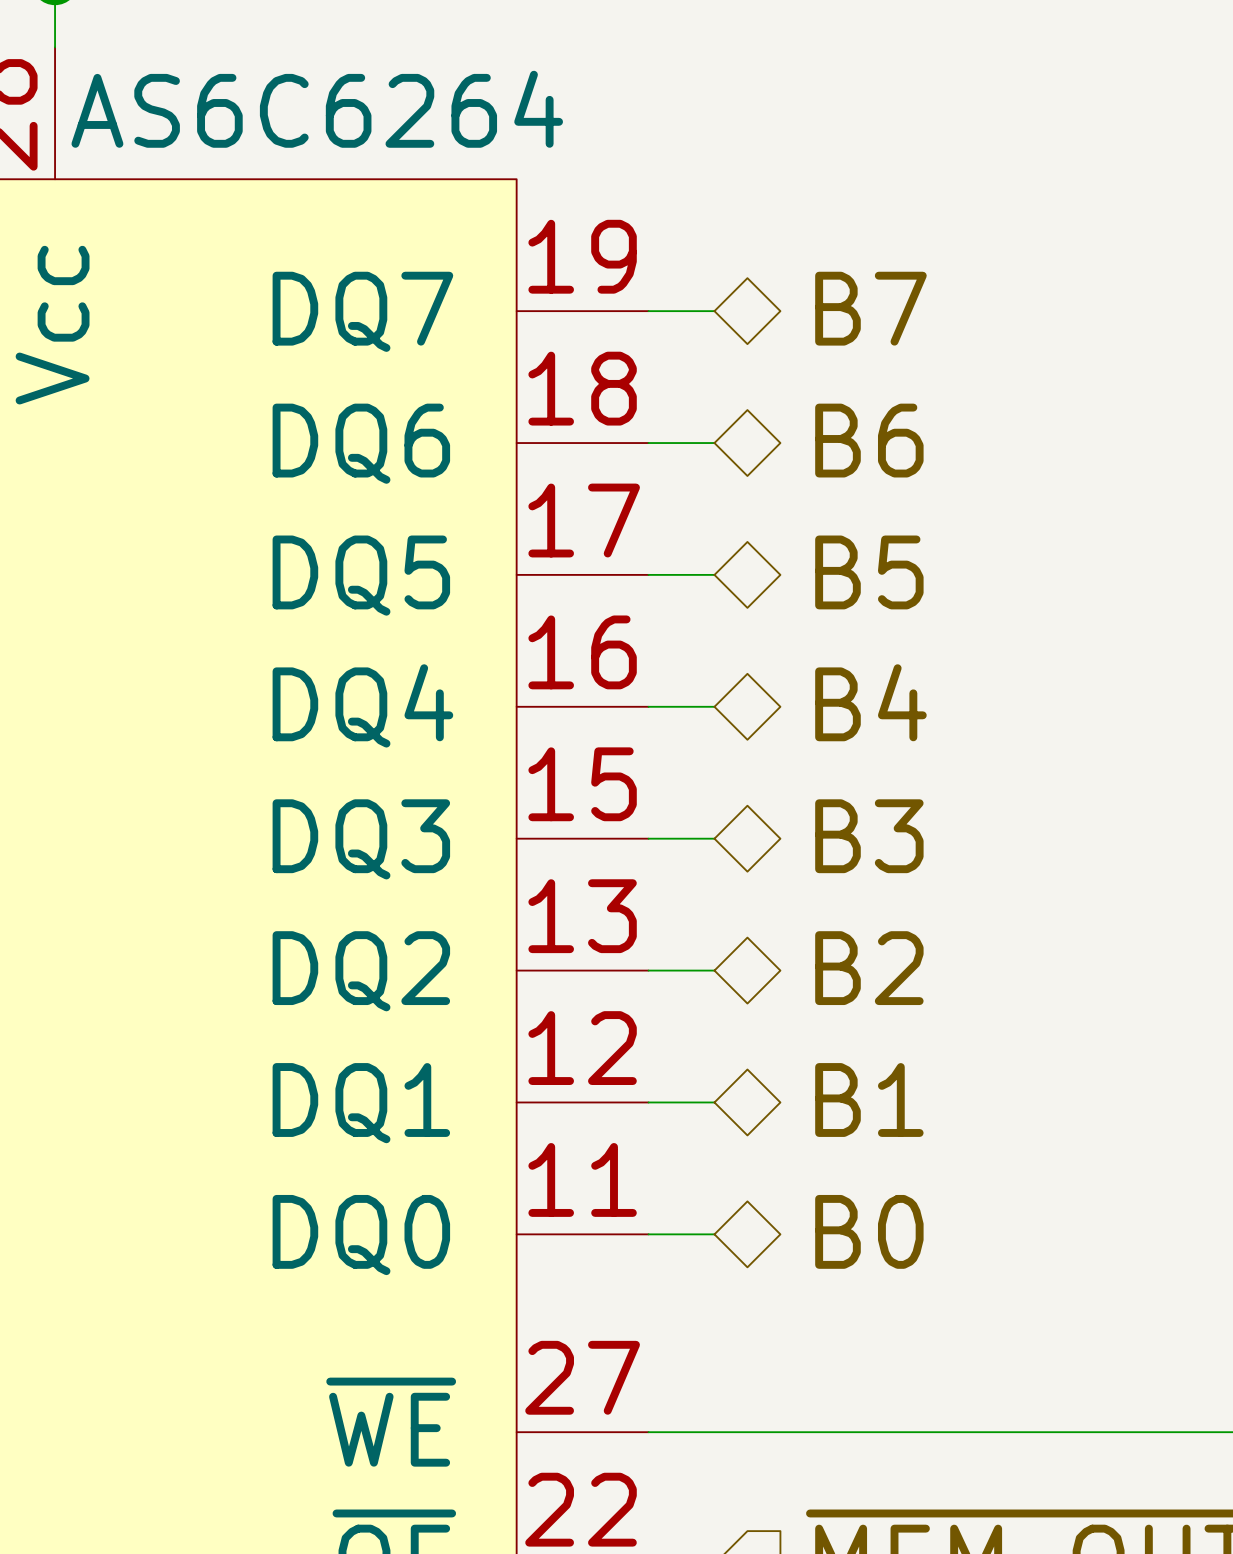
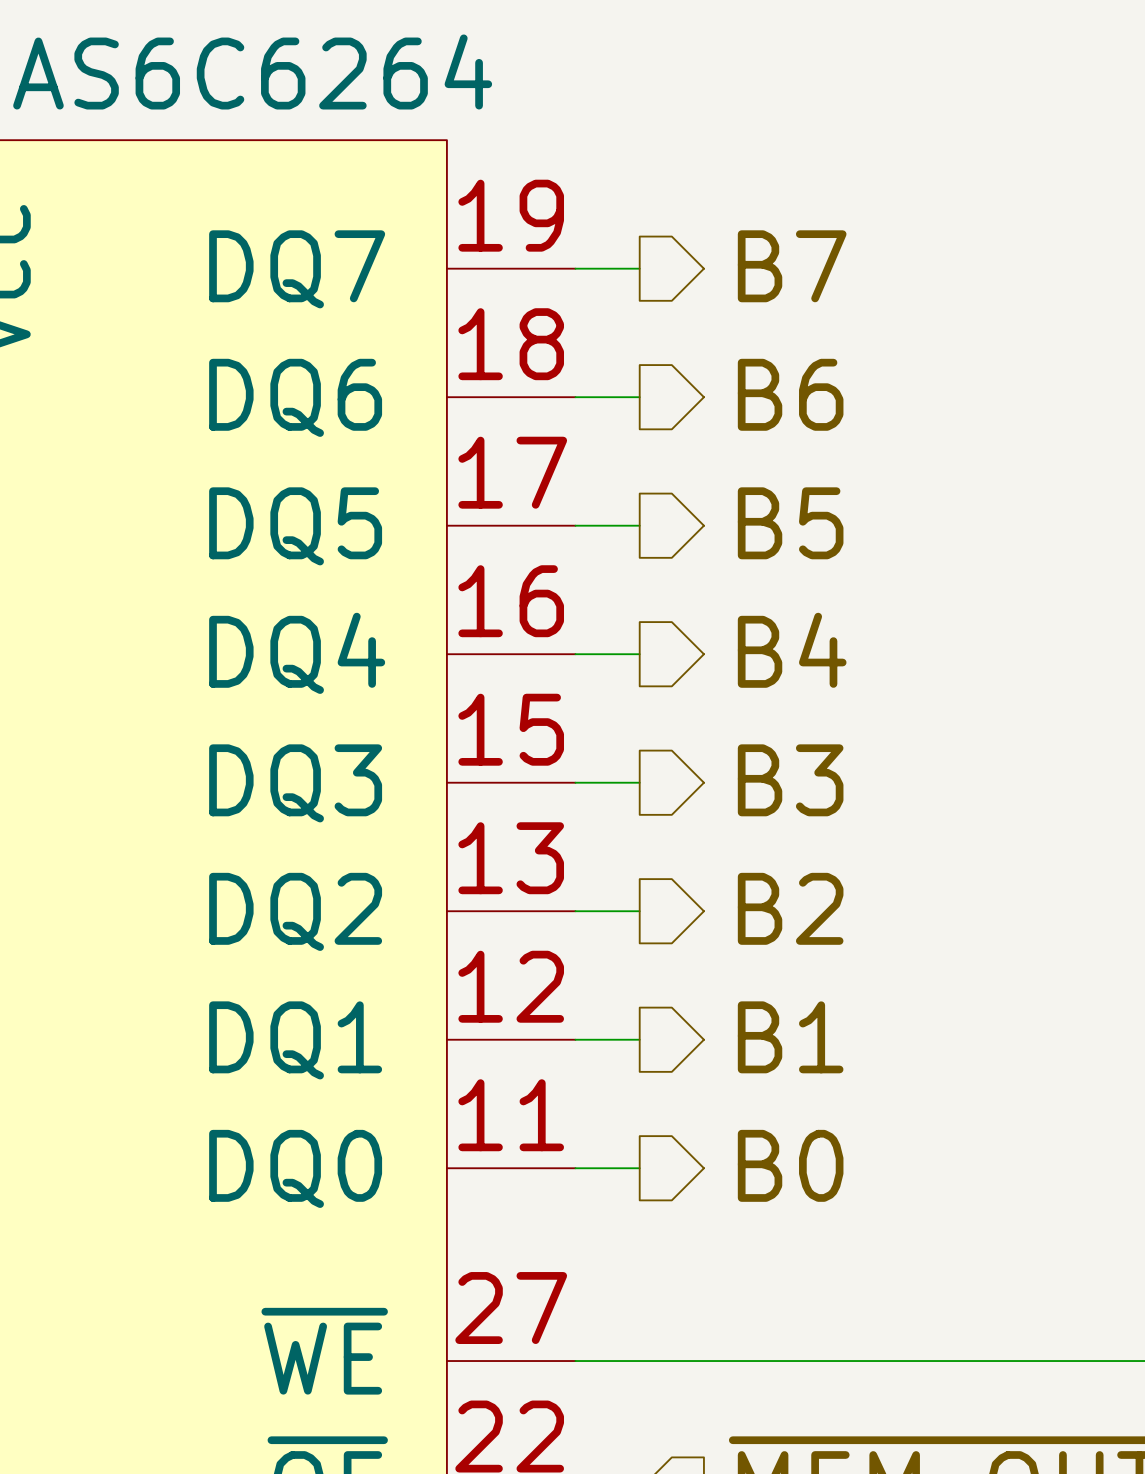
hierarchical label shape: bidirectional (870, 308) -> output (792, 266)
hierarchical label shape: bidirectional (869, 440) -> output (790, 394)
hierarchical label shape: bidirectional (869, 572) -> output (790, 523)
hierarchical label shape: bidirectional (870, 702) -> output (792, 650)
hierarchical label shape: bidirectional (869, 836) -> output (790, 780)
hierarchical label shape: bidirectional (869, 968) -> output (790, 908)
hierarchical label shape: bidirectional (869, 1100) -> output (790, 1037)
hierarchical label shape: bidirectional (869, 1231) -> output (790, 1165)

